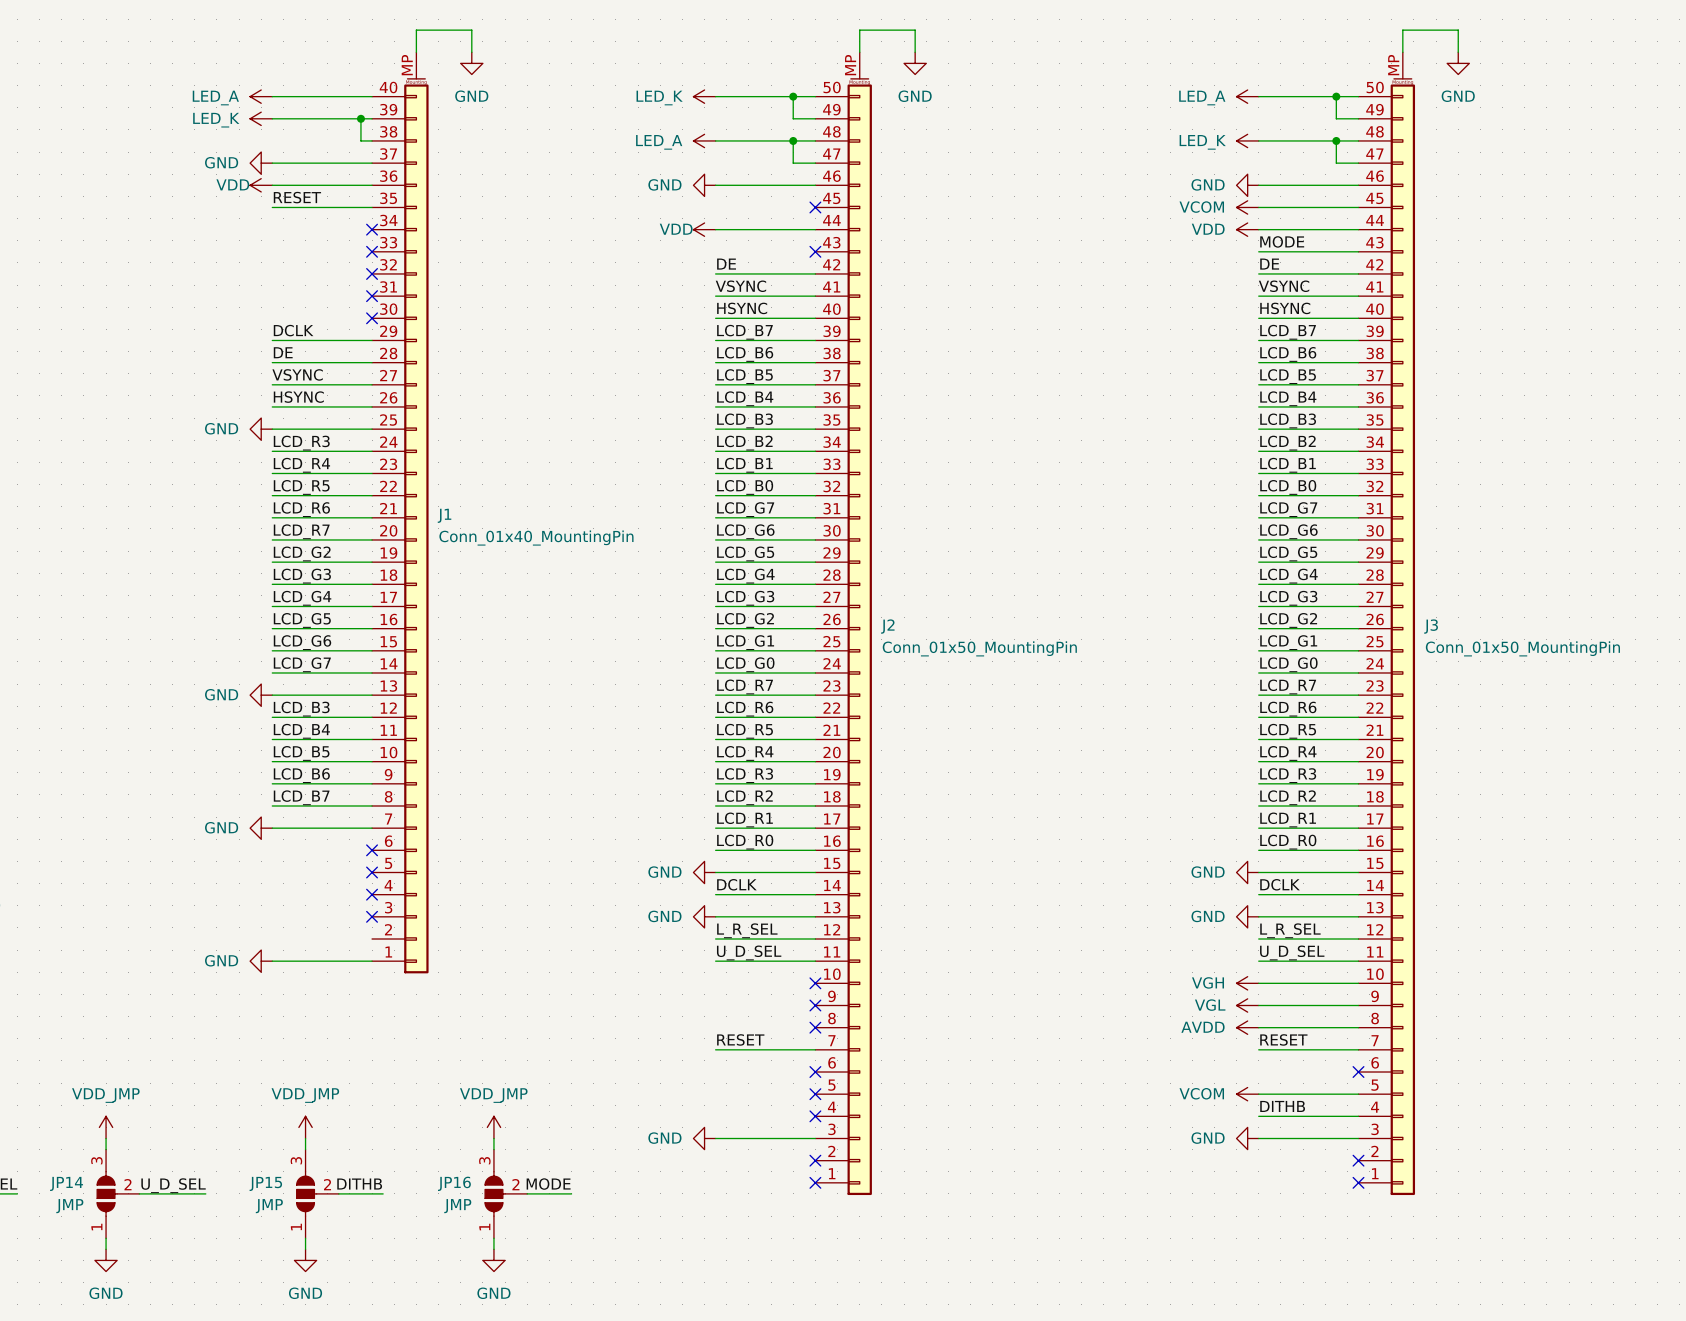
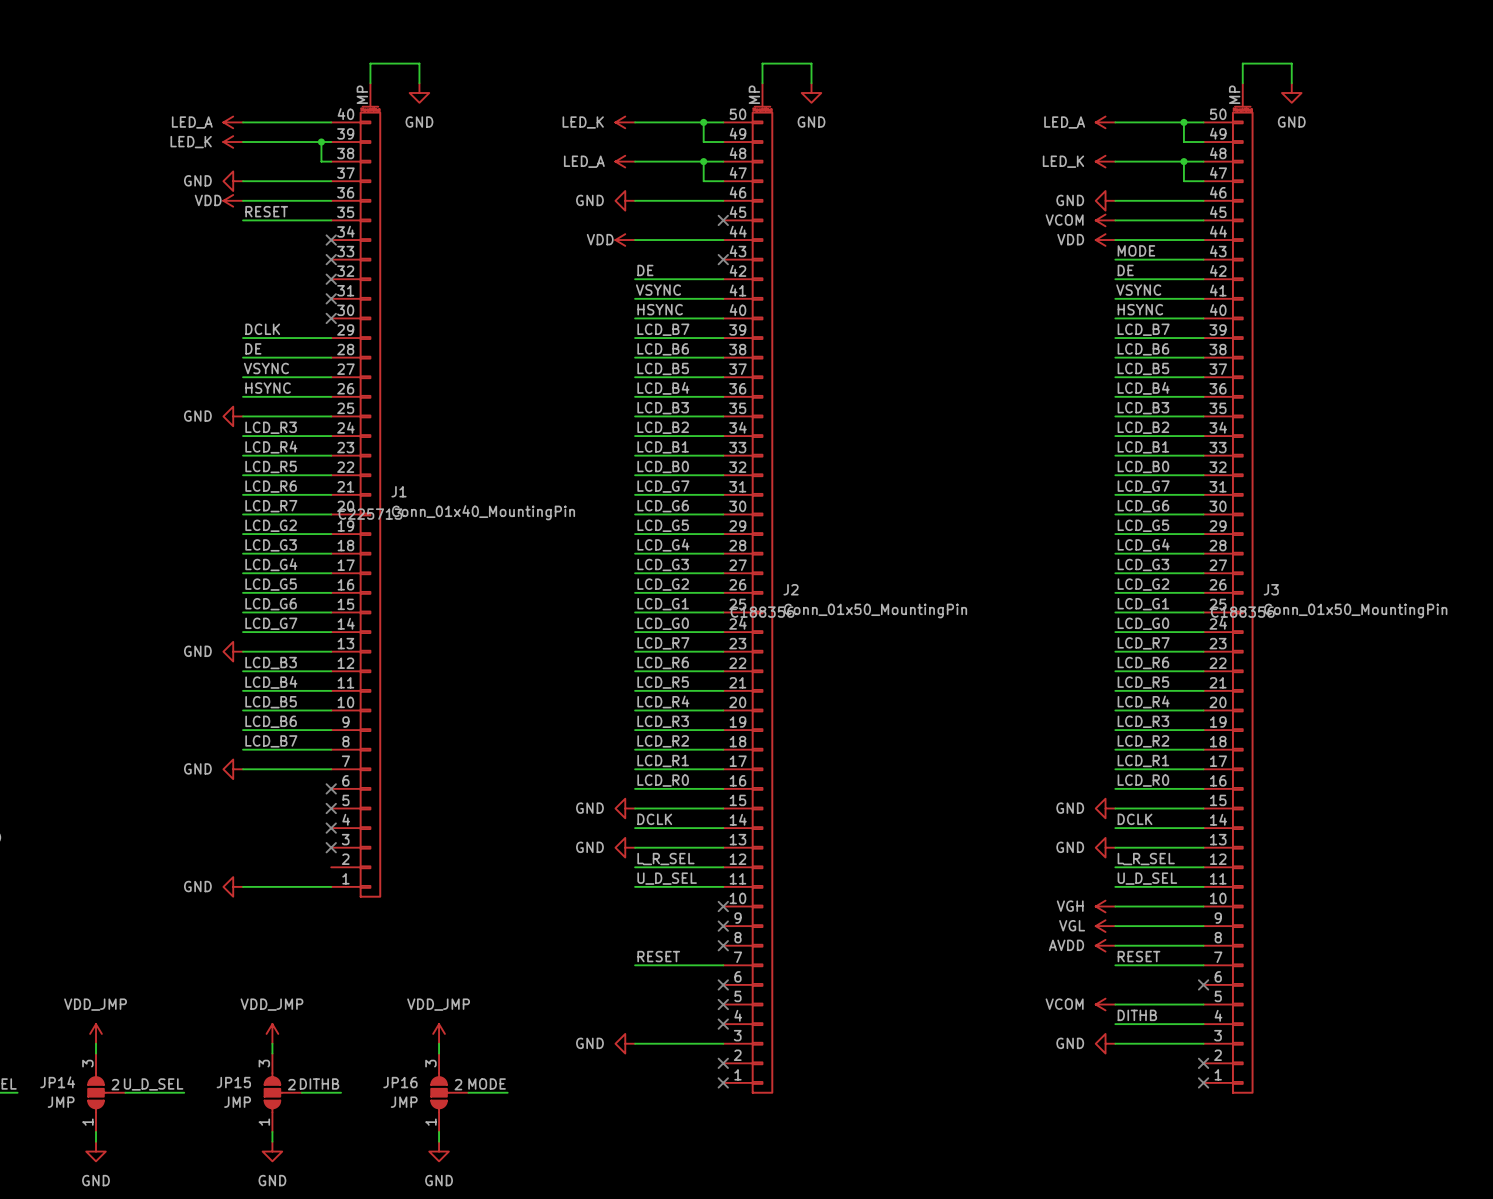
J1 text: none -> C225713 (370, 514)
J2 text: none -> C188356 (762, 612)
J3 text: none -> C188356 (1242, 612)

